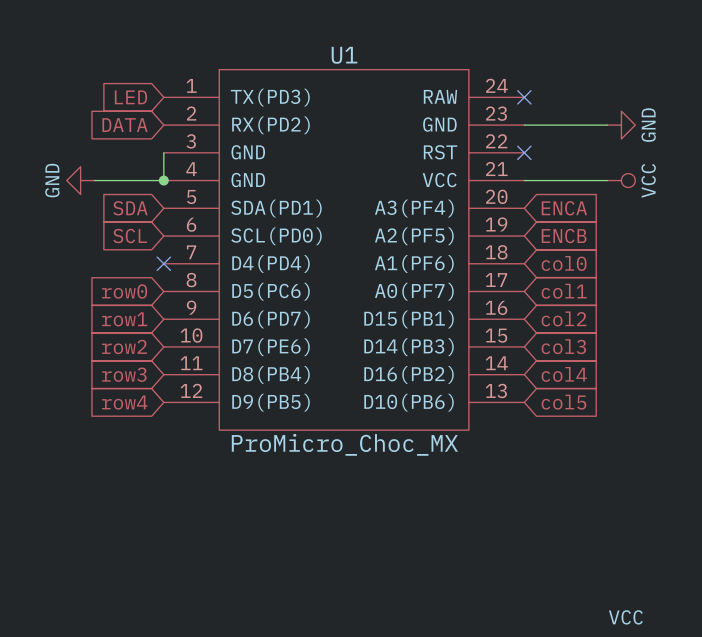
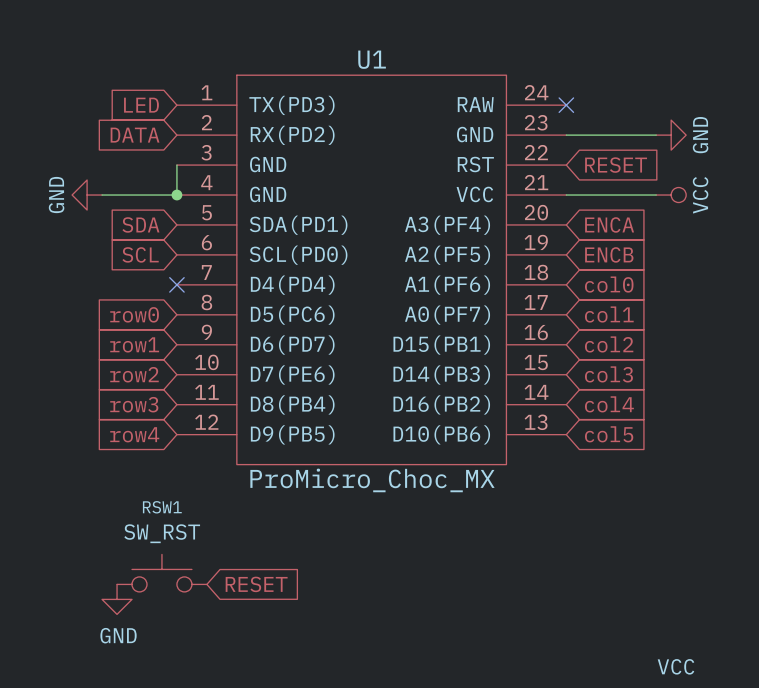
no-connect mark: (524, 152) -> none
global label: none -> RESET (616, 165)
RSW1: none -> SW_RST (161, 573)
global label: none -> RESET (256, 584)
power symbol: none -> GND (117, 599)

